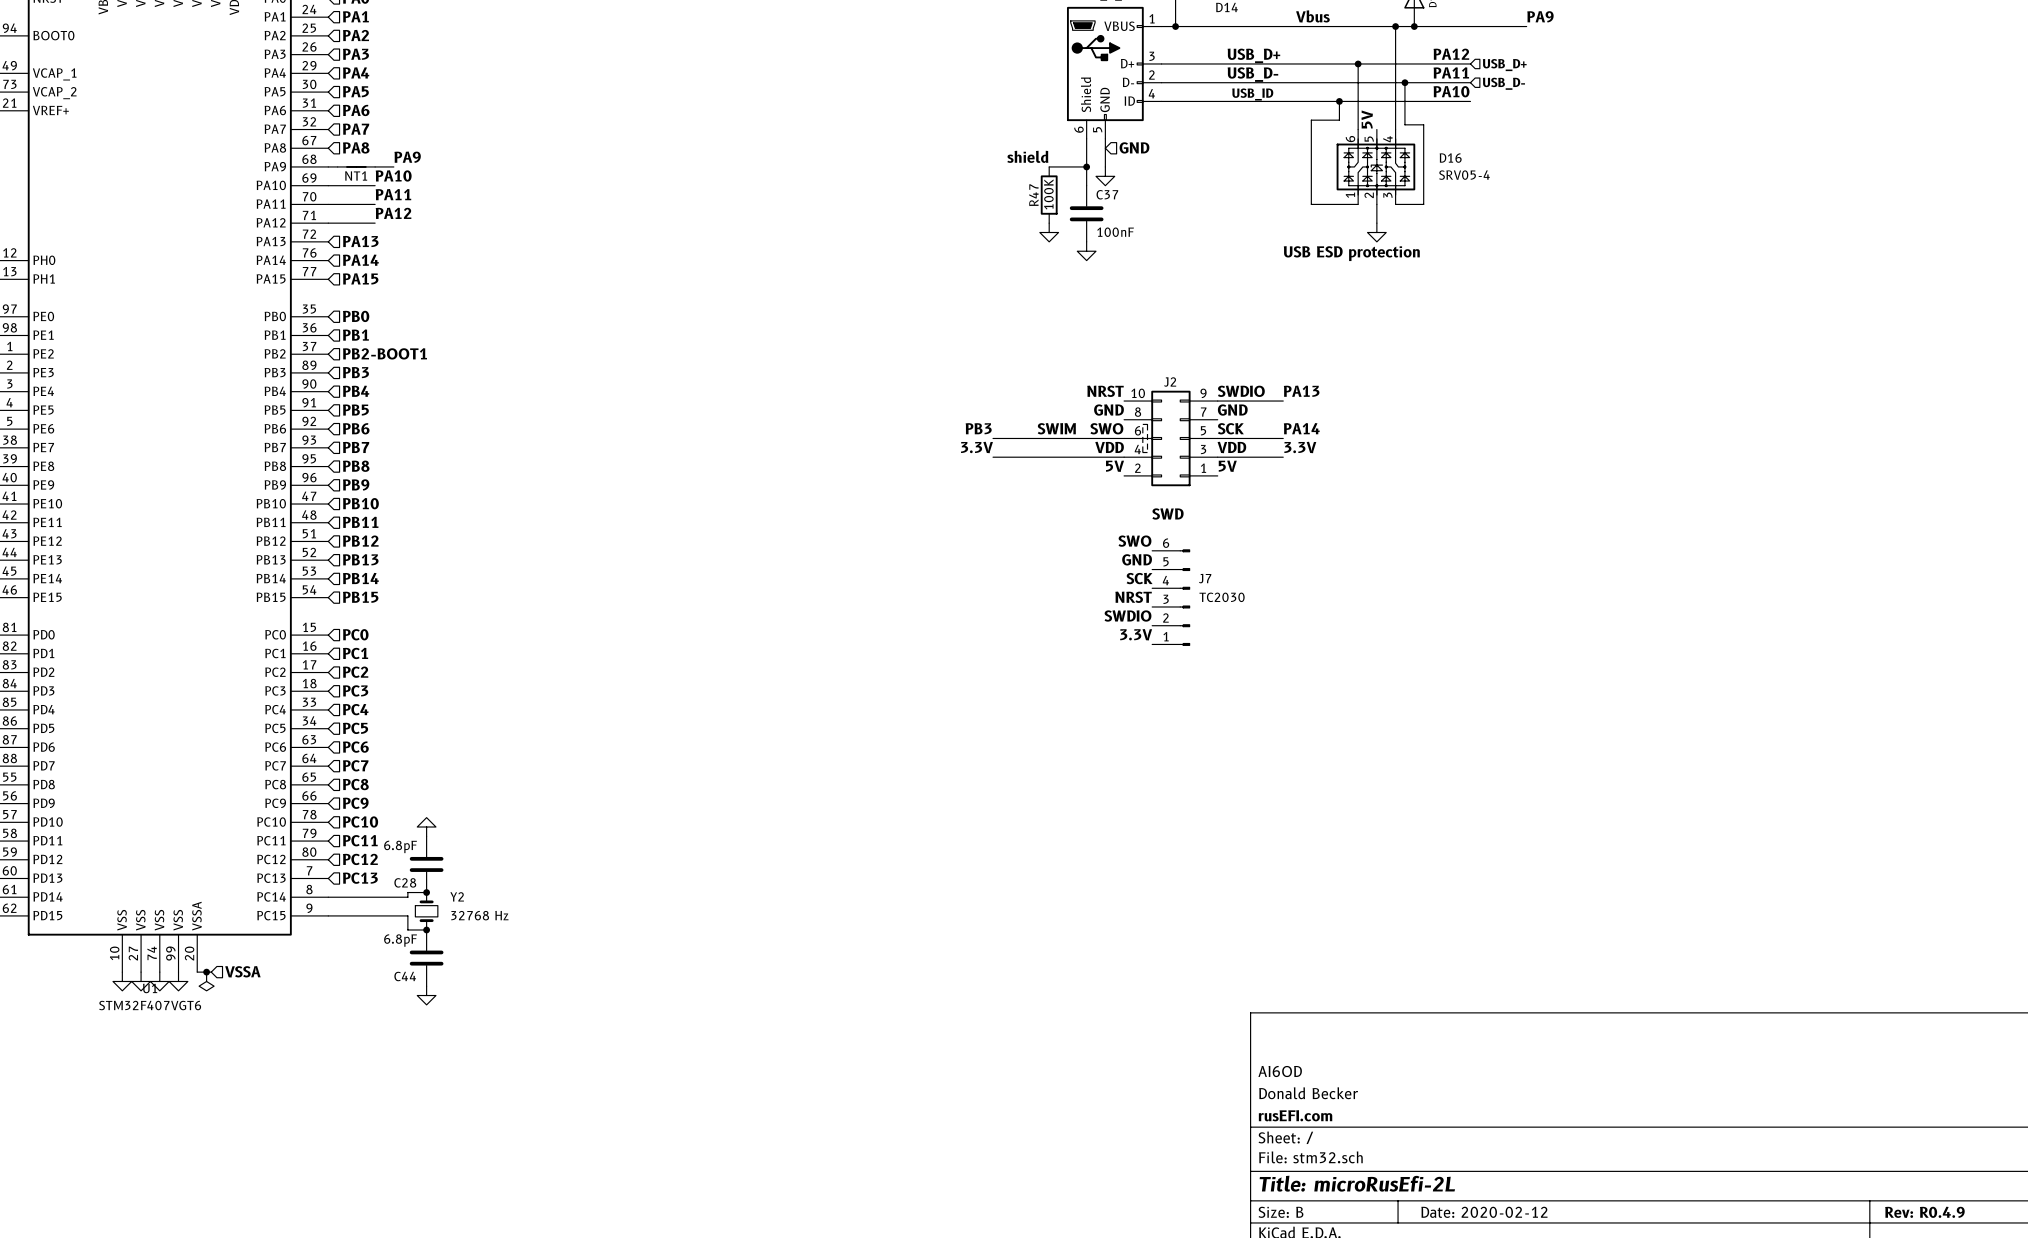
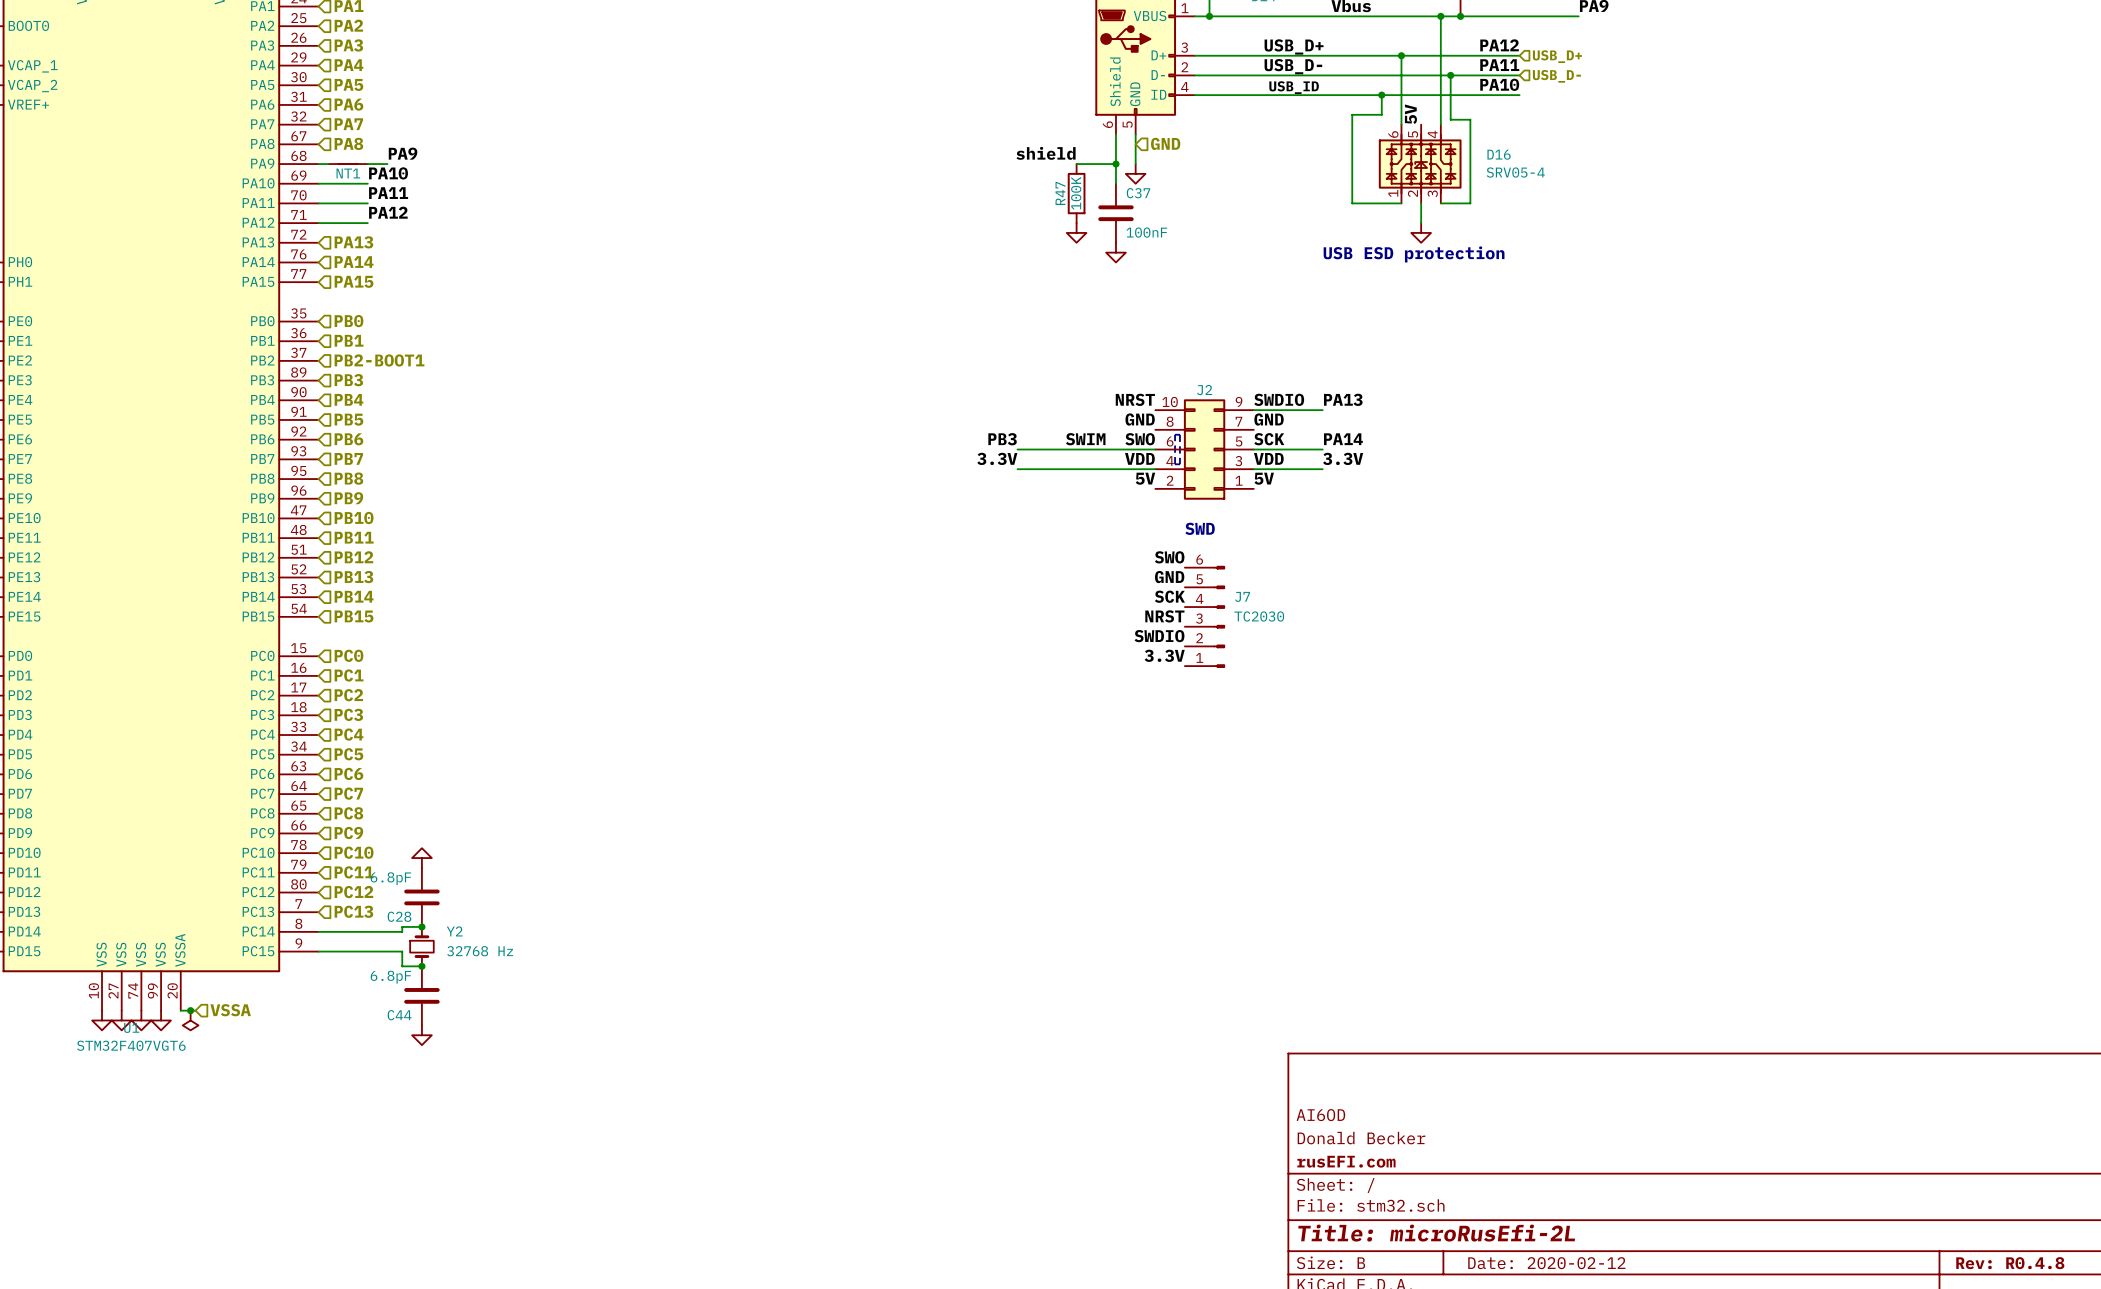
title block: Rev: R0.4.9 (1924, 1212) -> Rev: R0.4.8 (2010, 1263)

